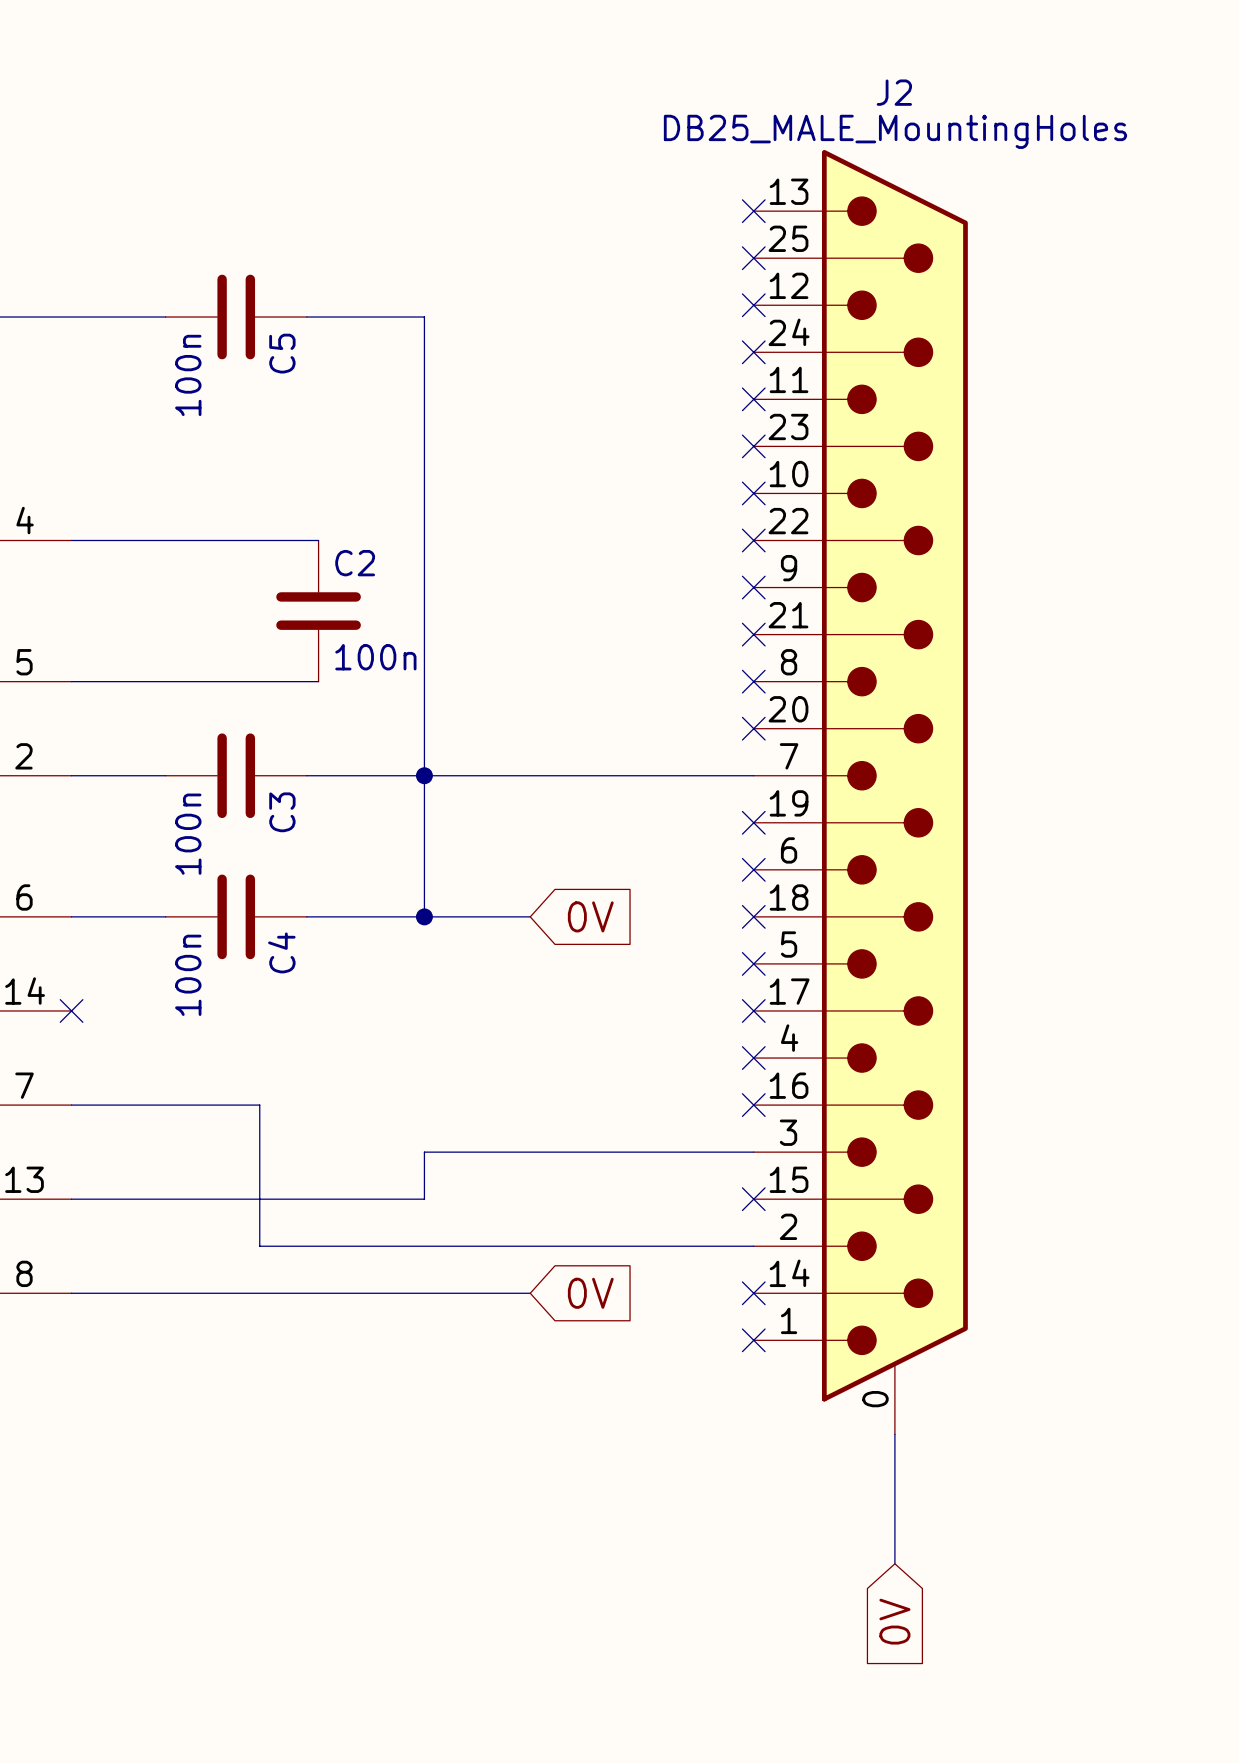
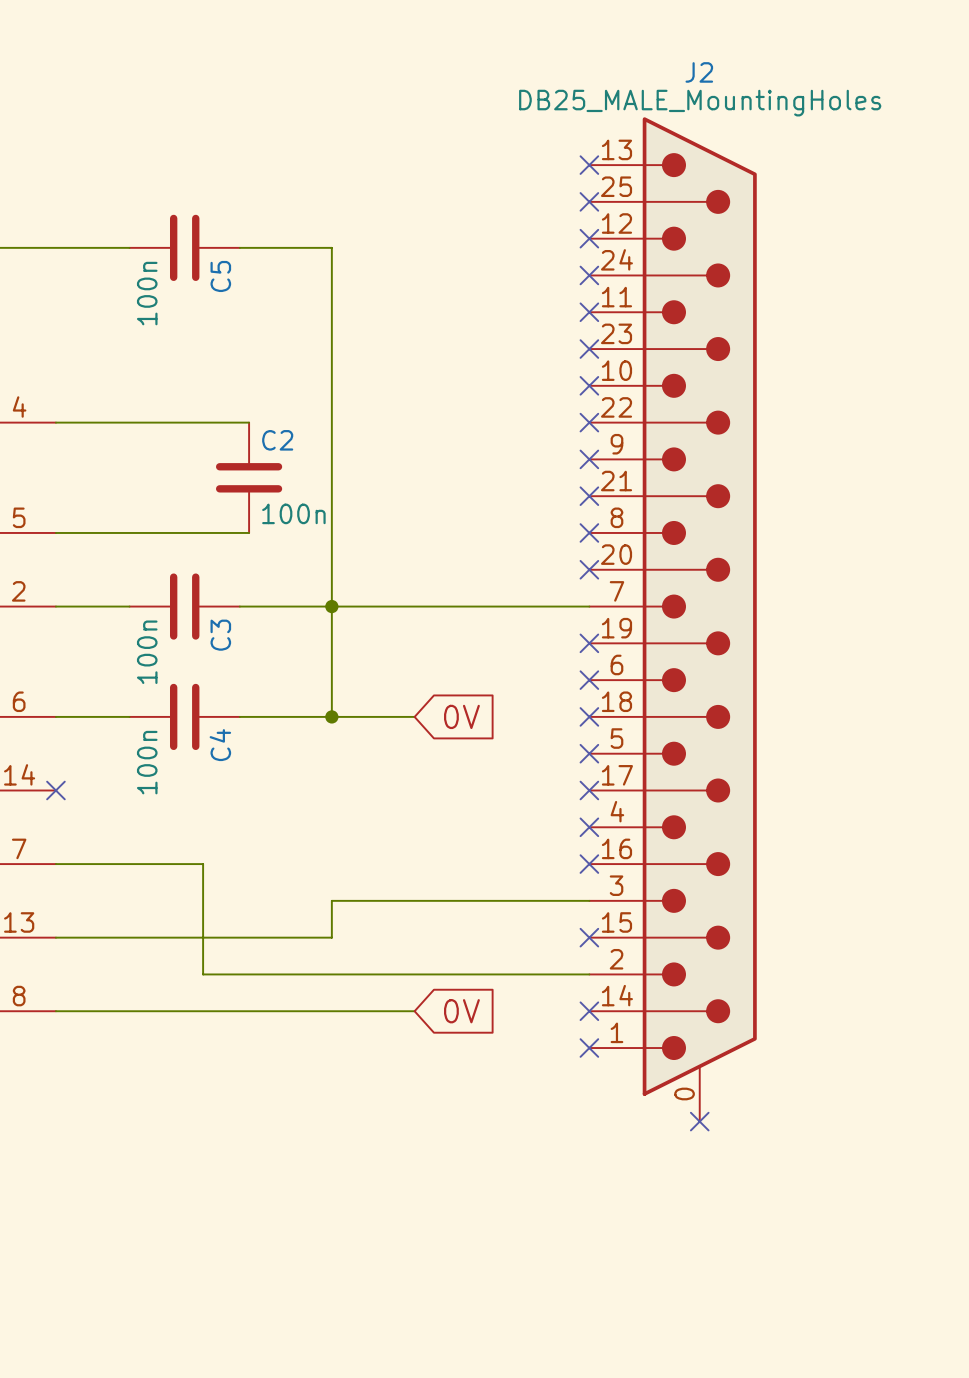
wire: (894, 1434) (894, 1563) -> none
no-connect mark: none -> (699, 1121)
global label: 0V (894, 1621) -> none

